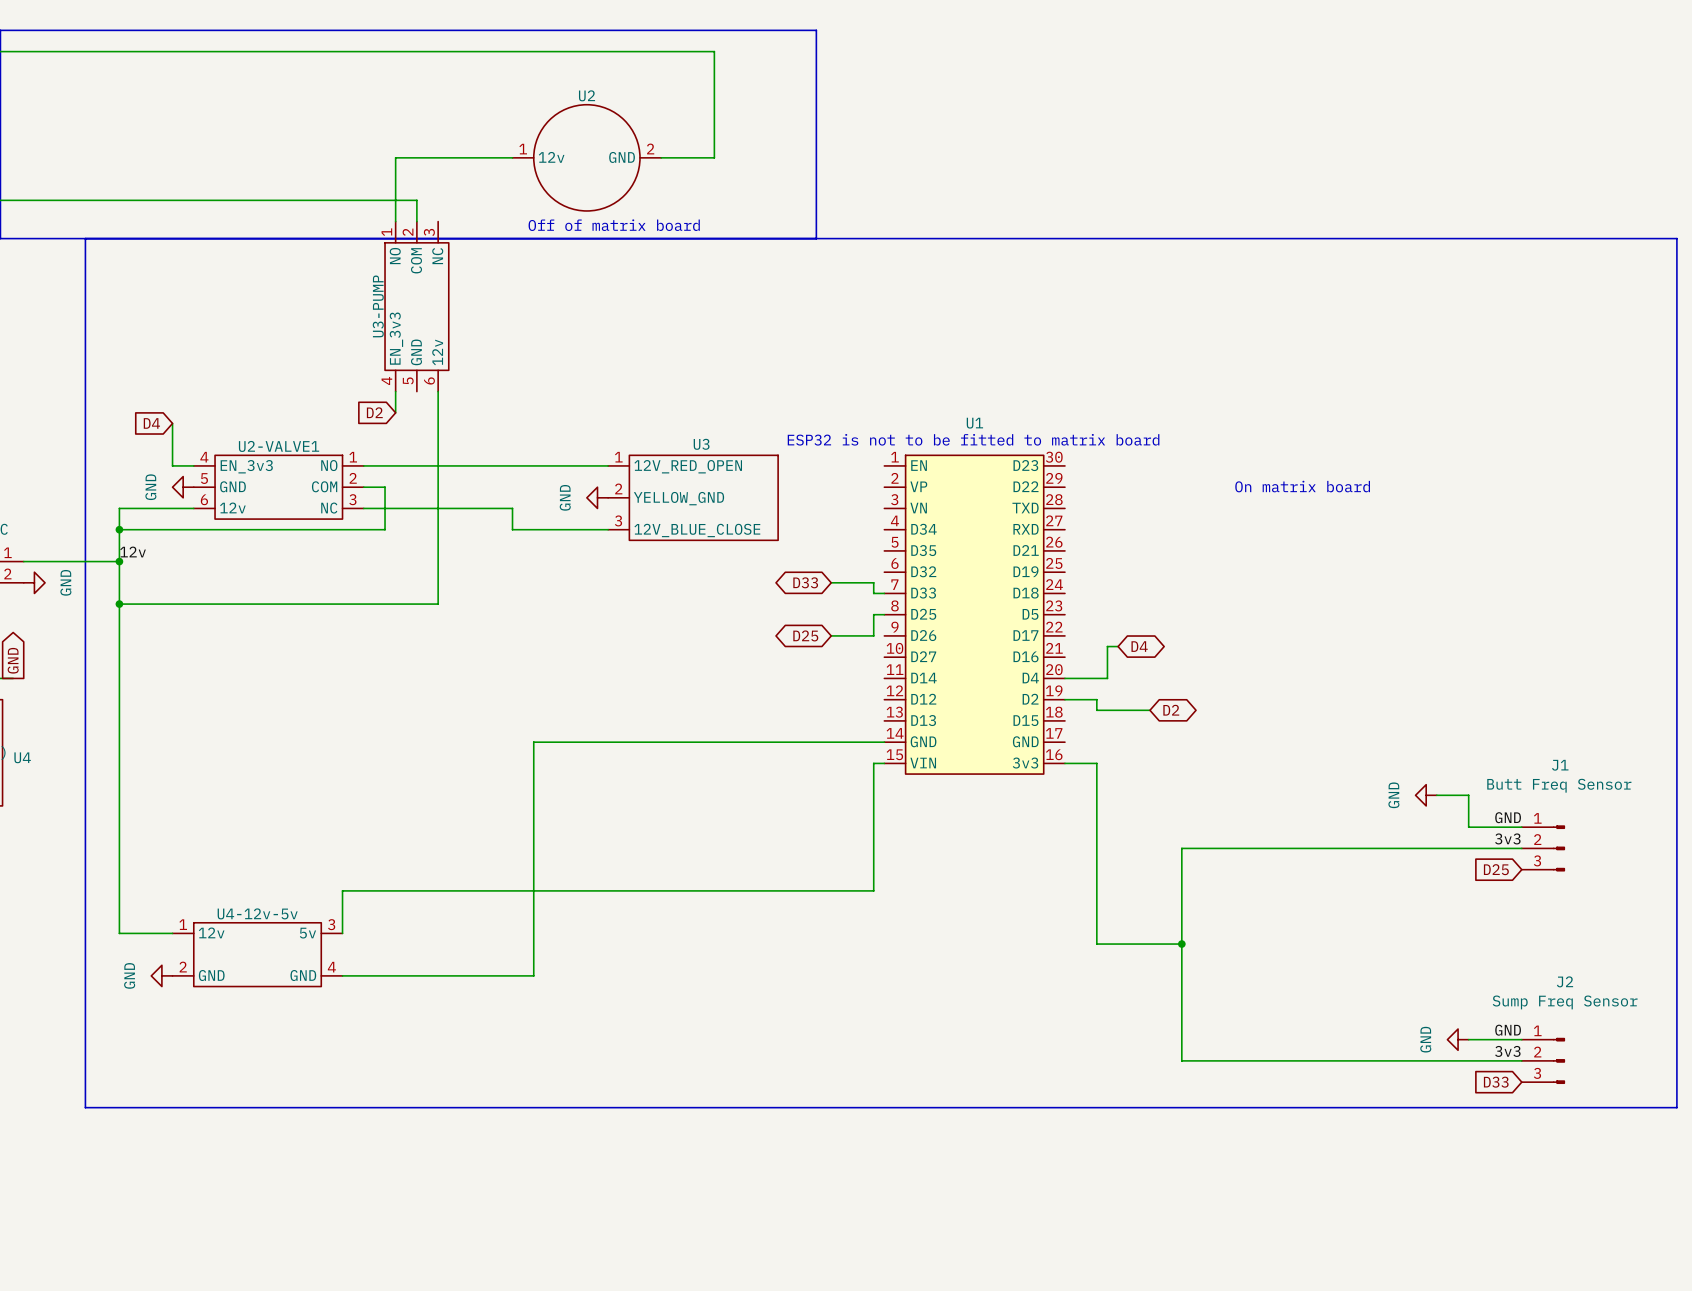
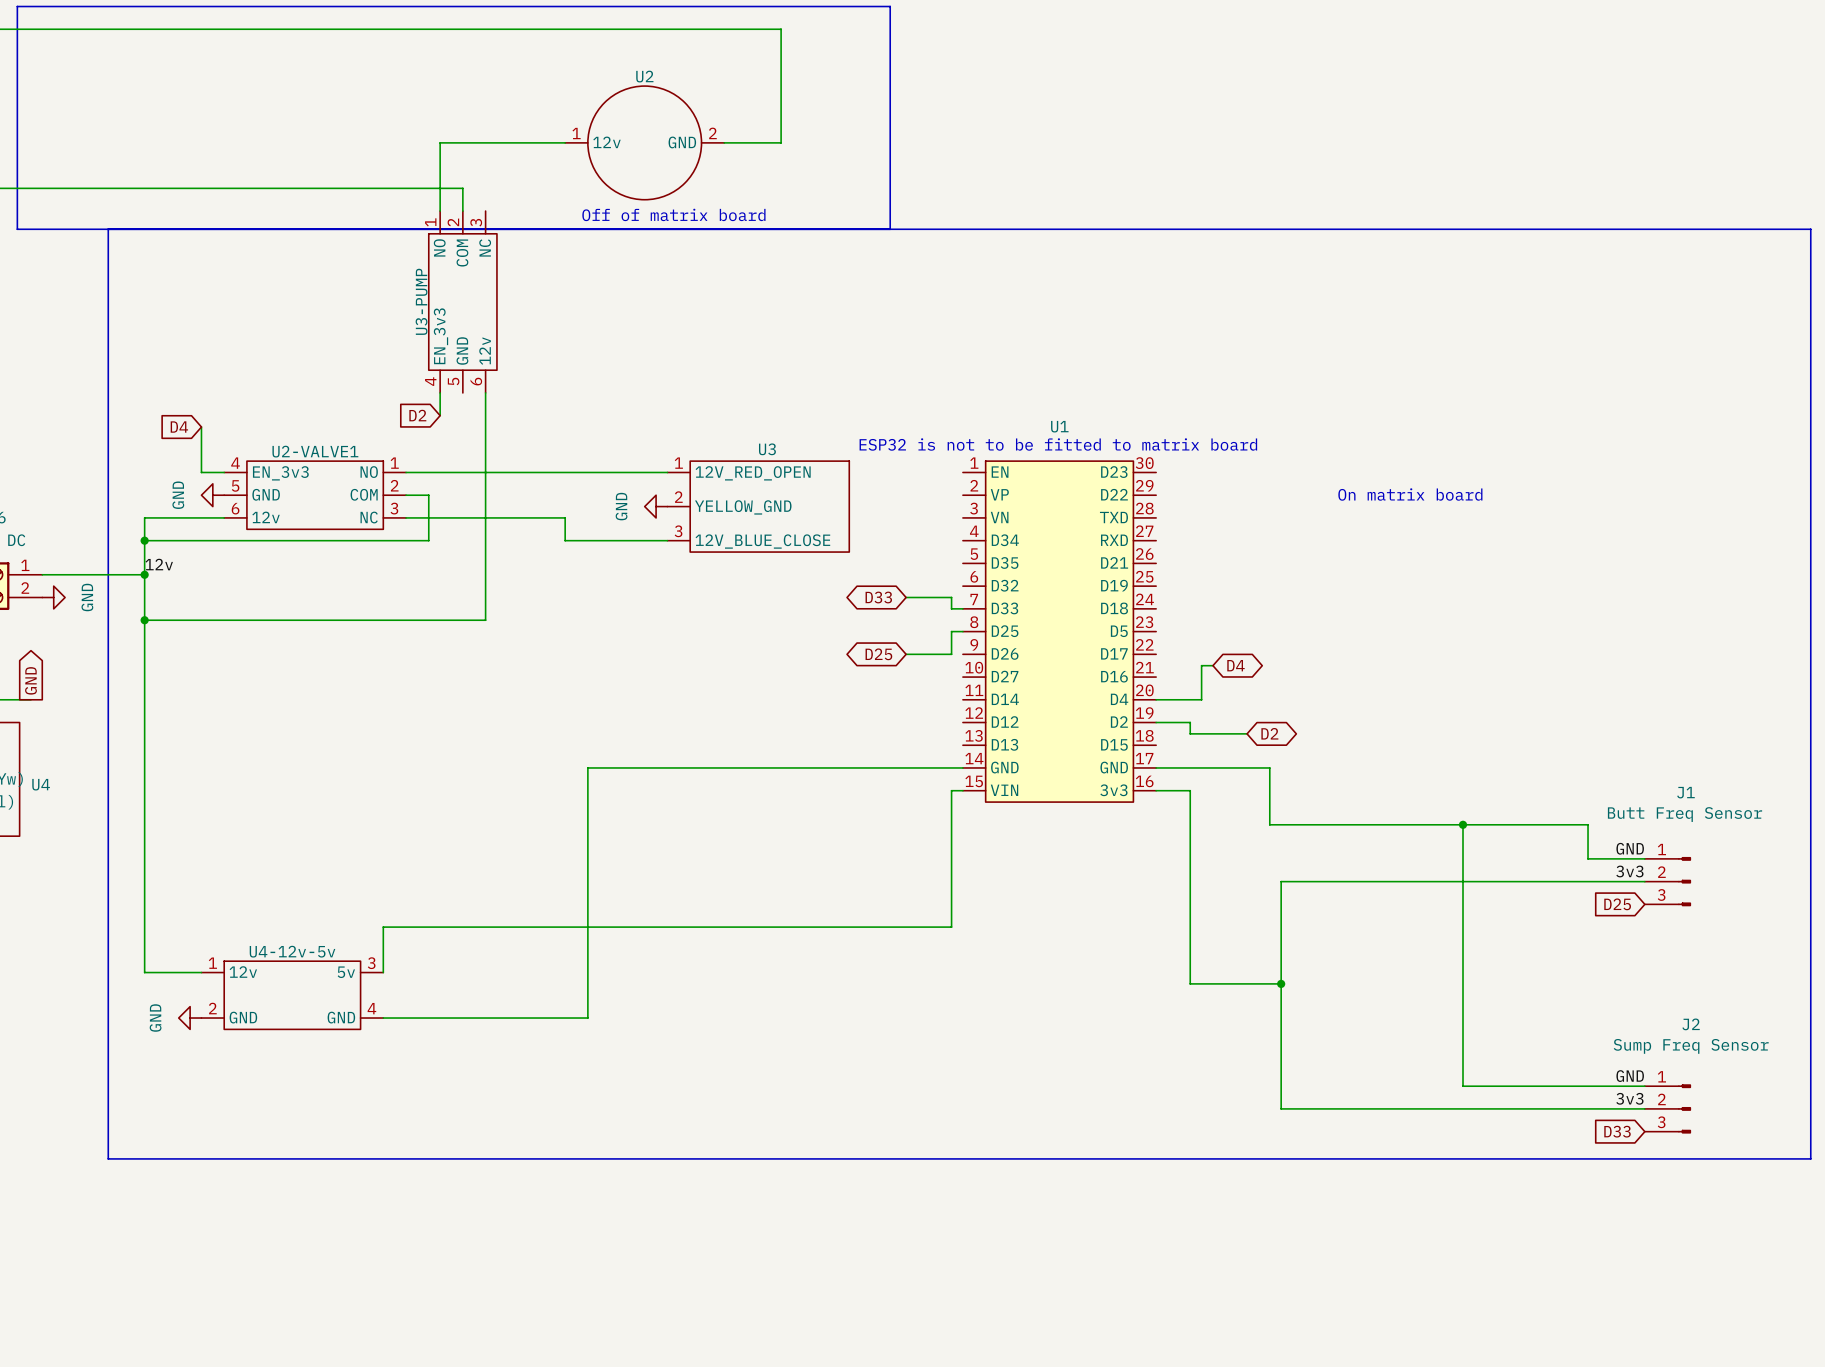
wire: none -> (1156, 767) (1269, 767) (1269, 824) (1553, 824)
wire: none -> (1463, 824) (1463, 1086) (1588, 1086)
junction: none -> (1463, 824)
power symbol: GND (1426, 795) -> none
power symbol: GND (1458, 1039) -> none

